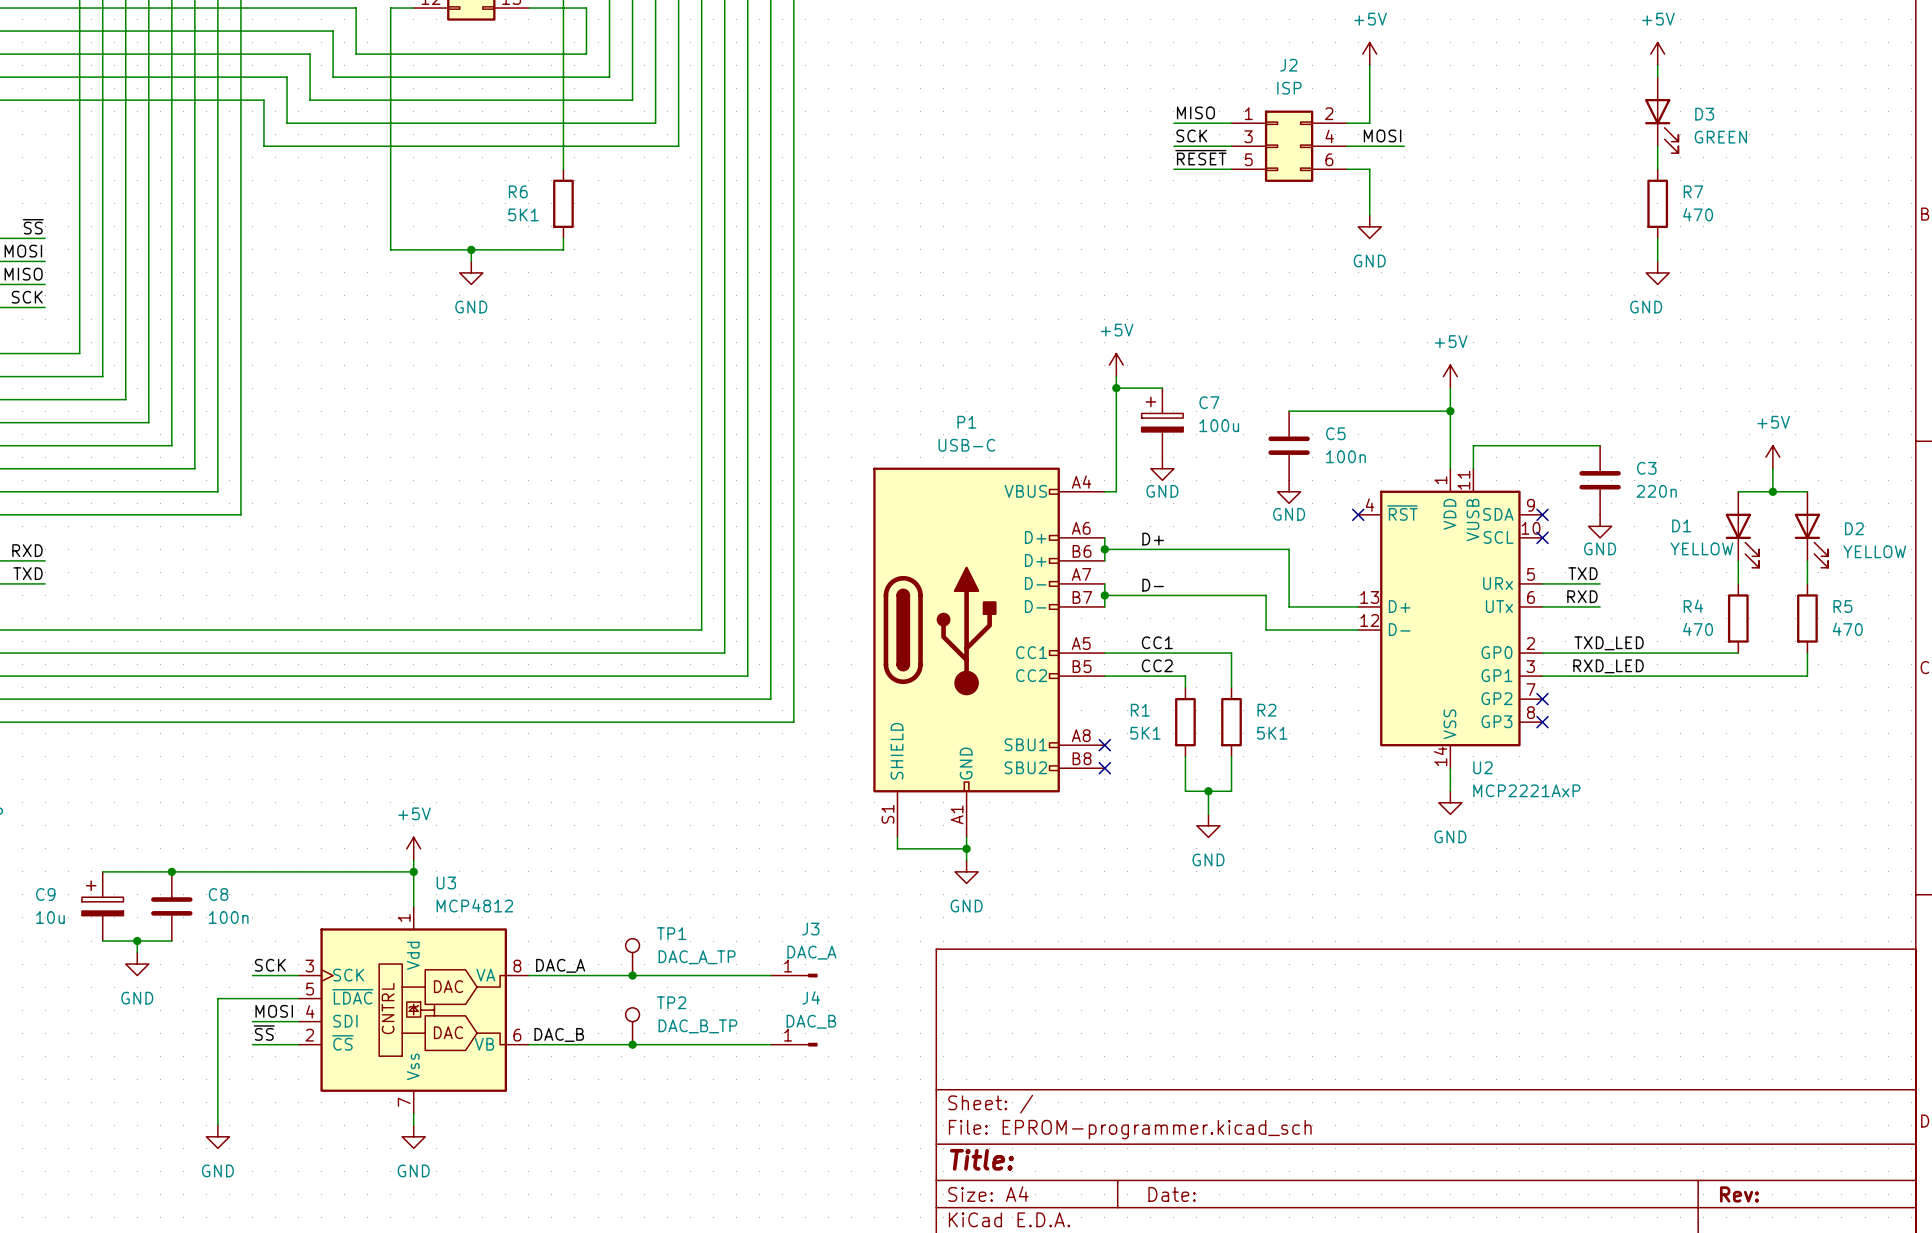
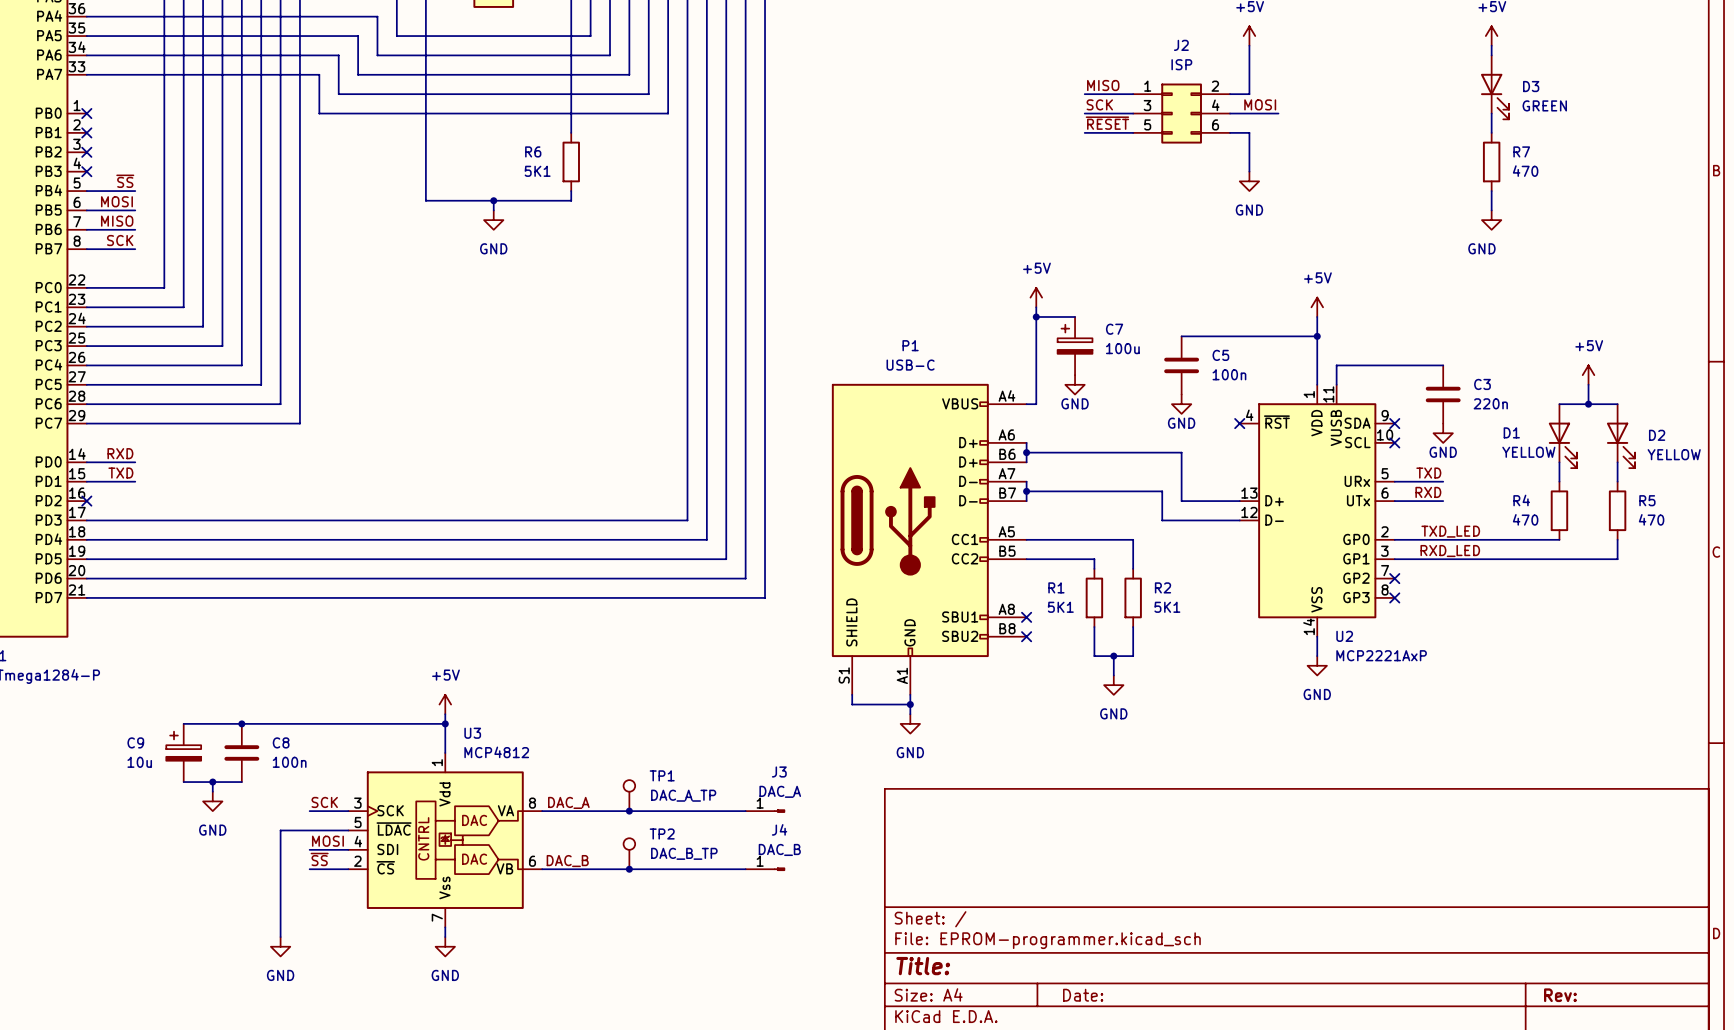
label: D+ (1153, 539) -> none
label: D- (1153, 585) -> none
label: CC1 (1157, 642) -> none
label: CC2 (1157, 665) -> none

